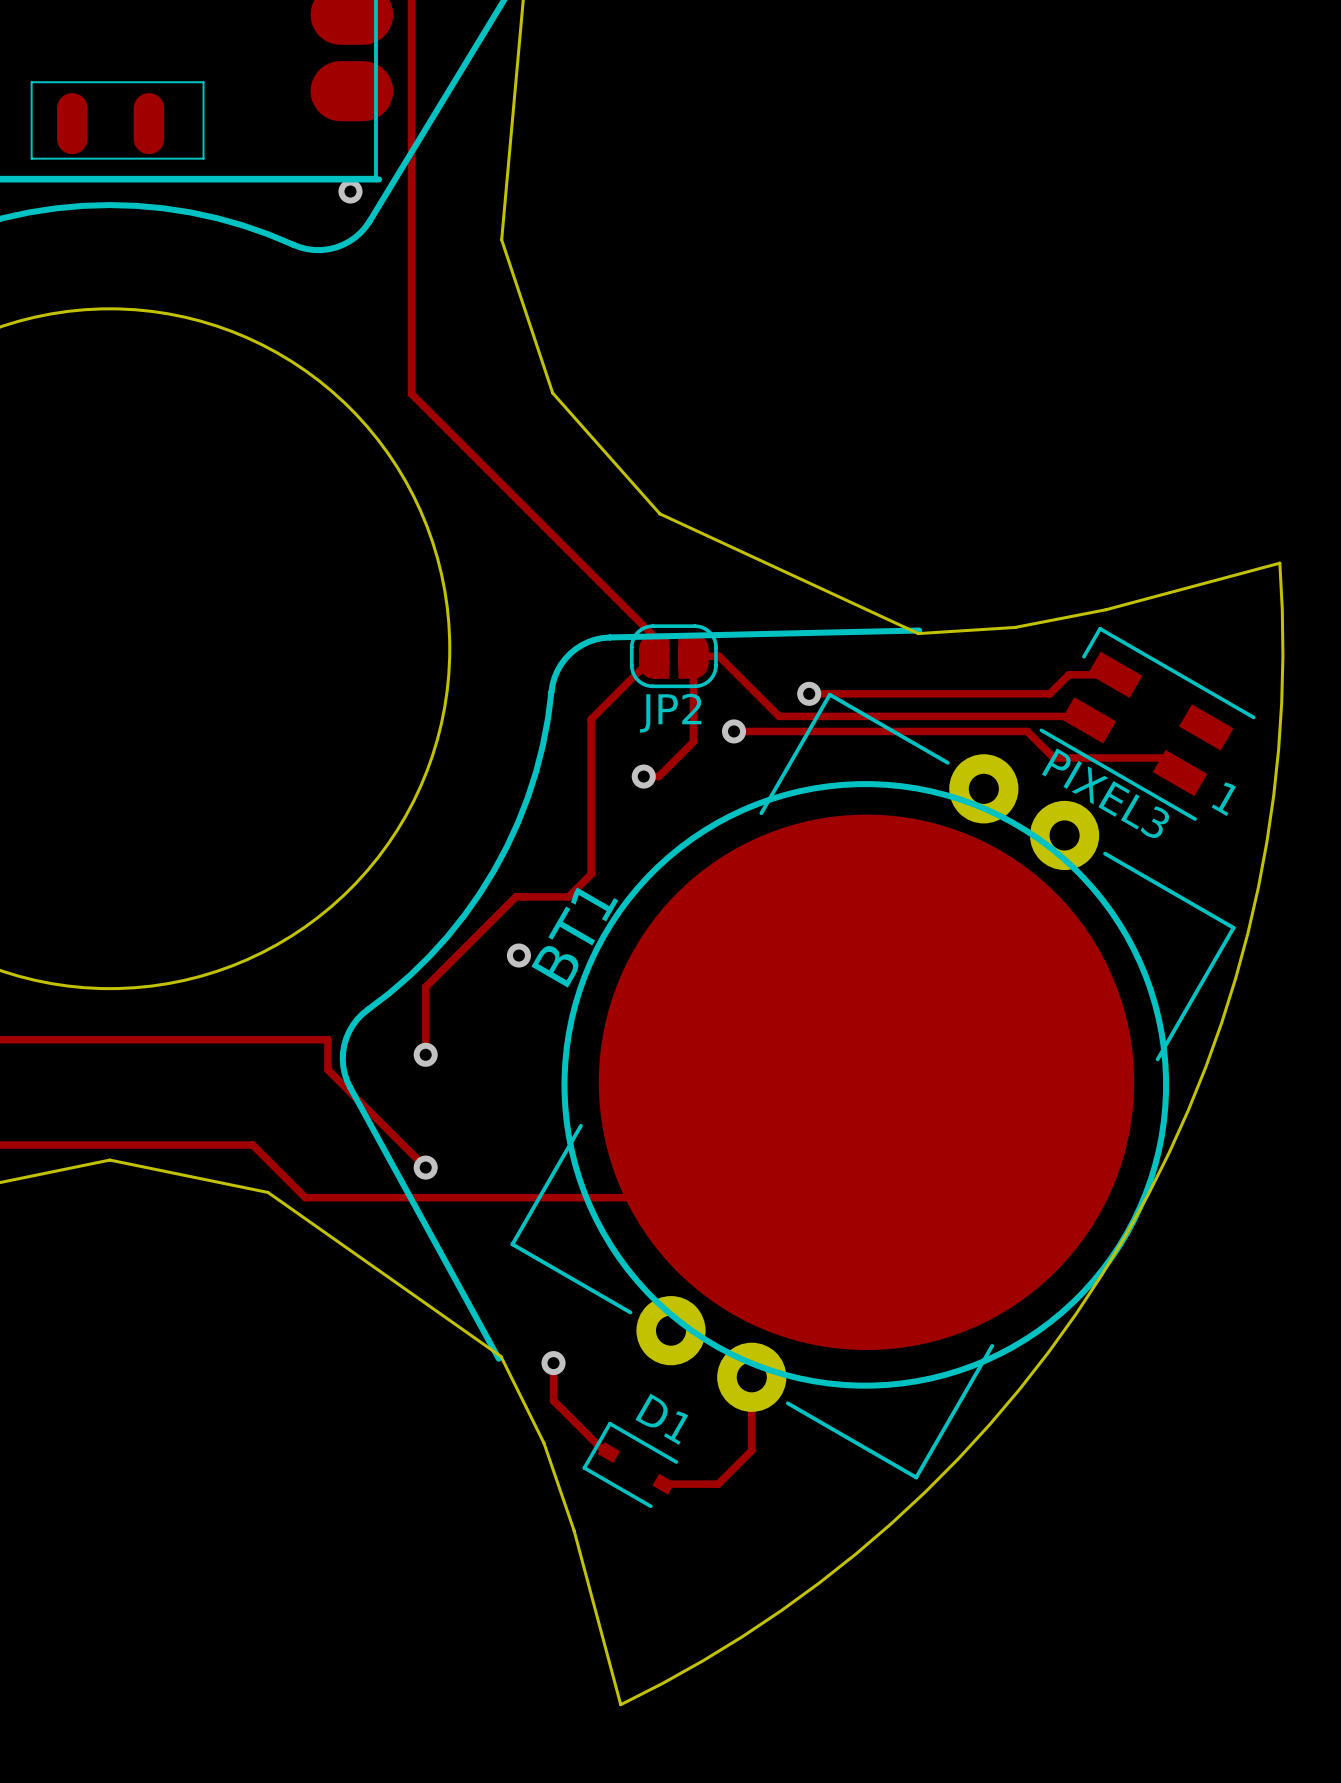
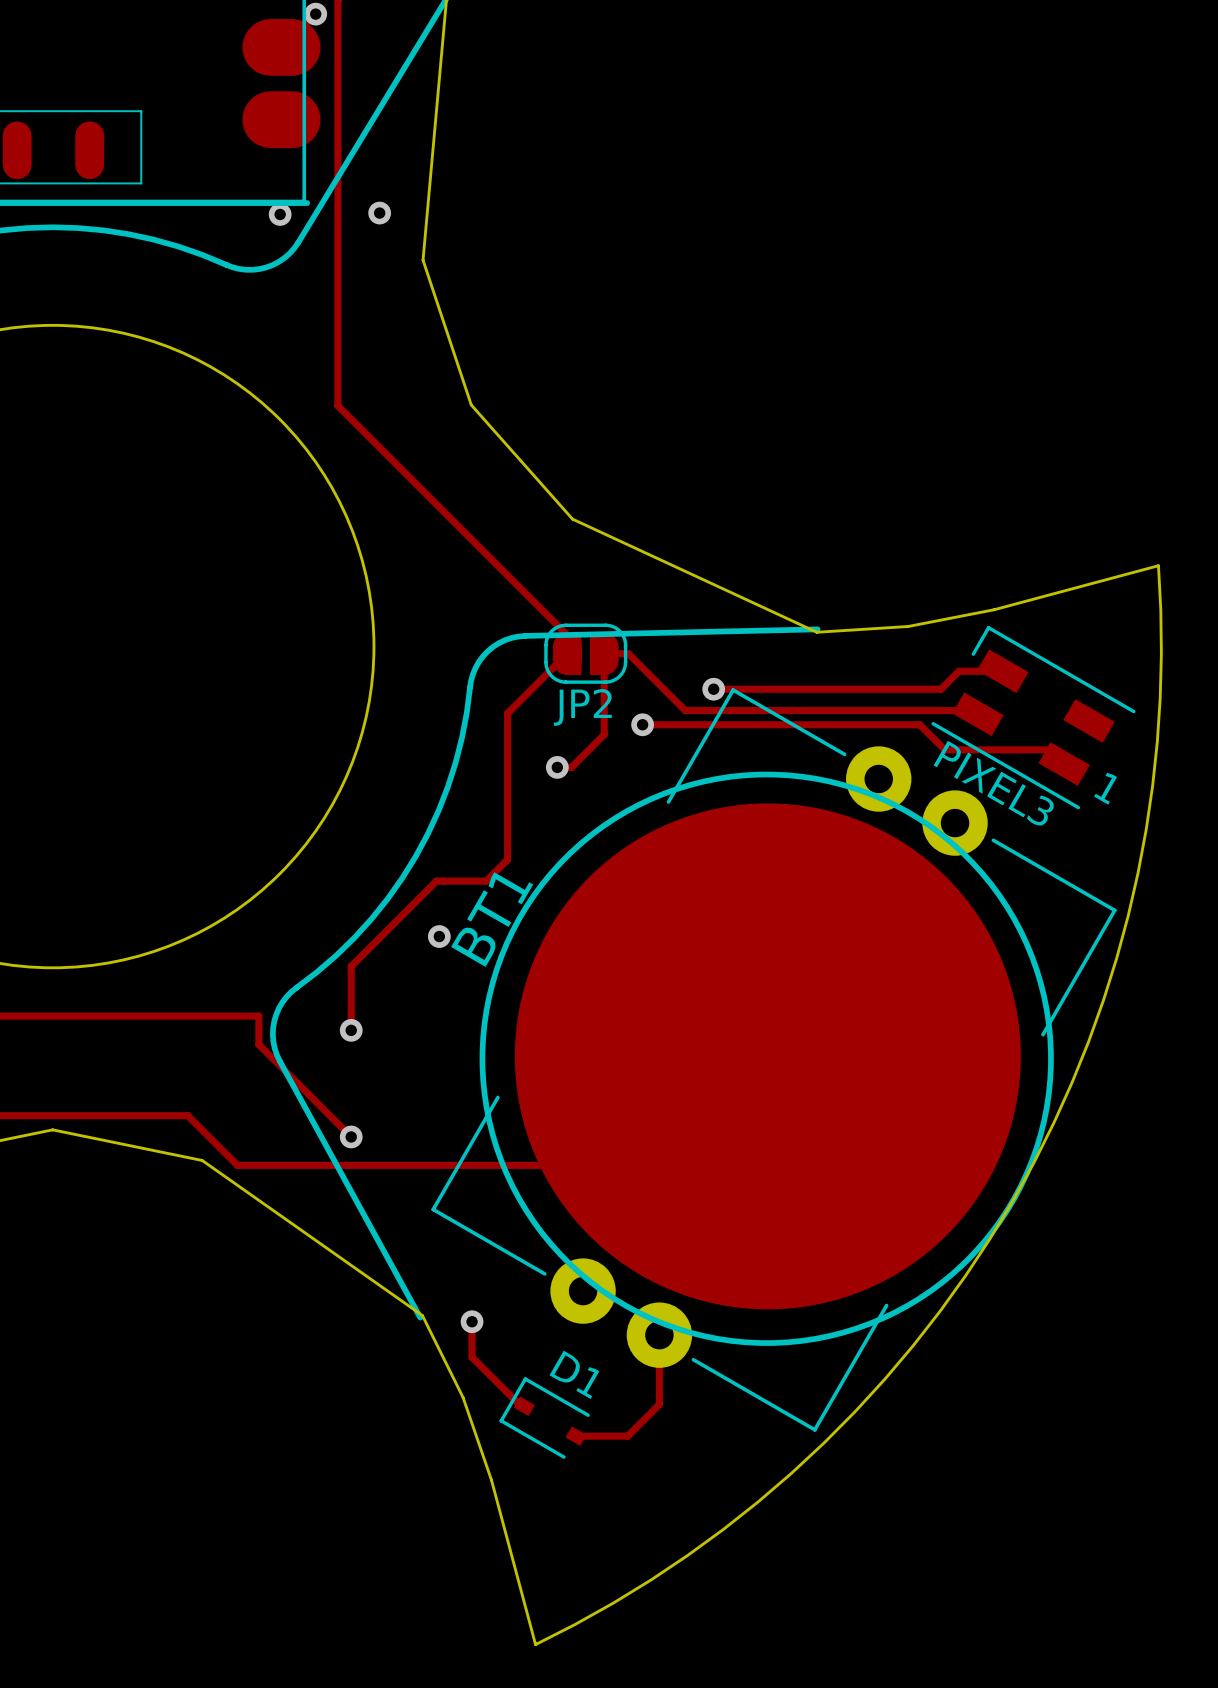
via: none -> (379, 213)

